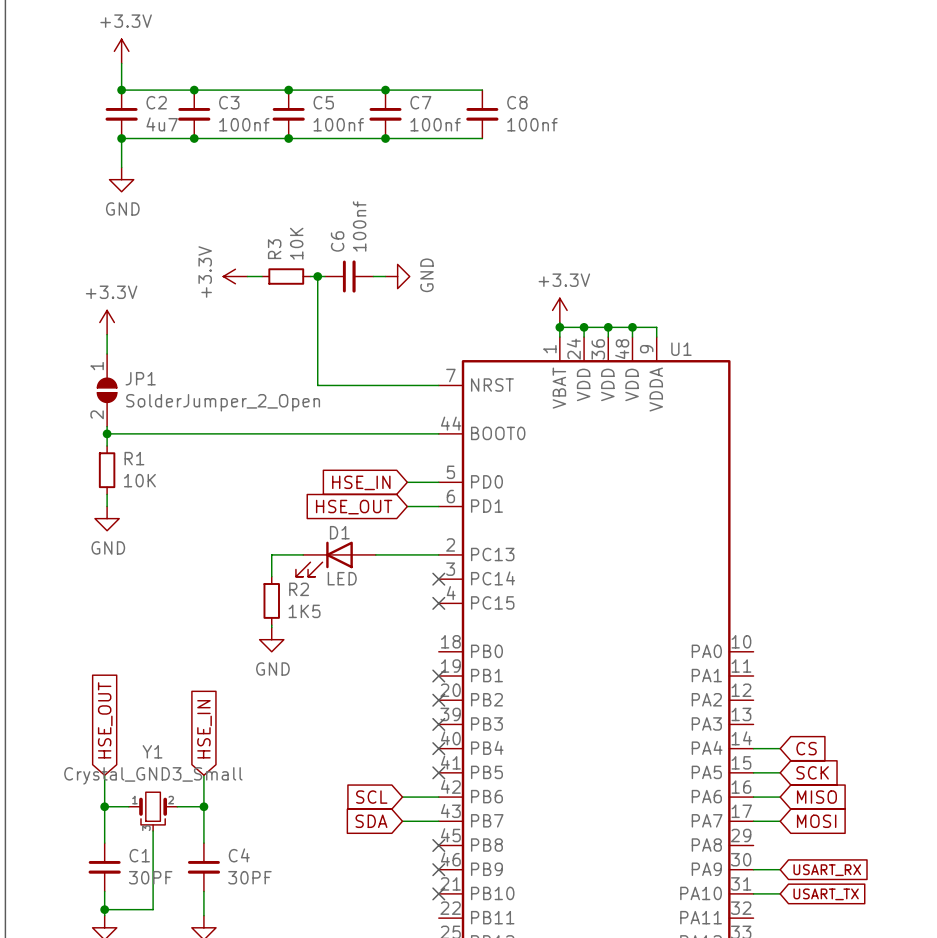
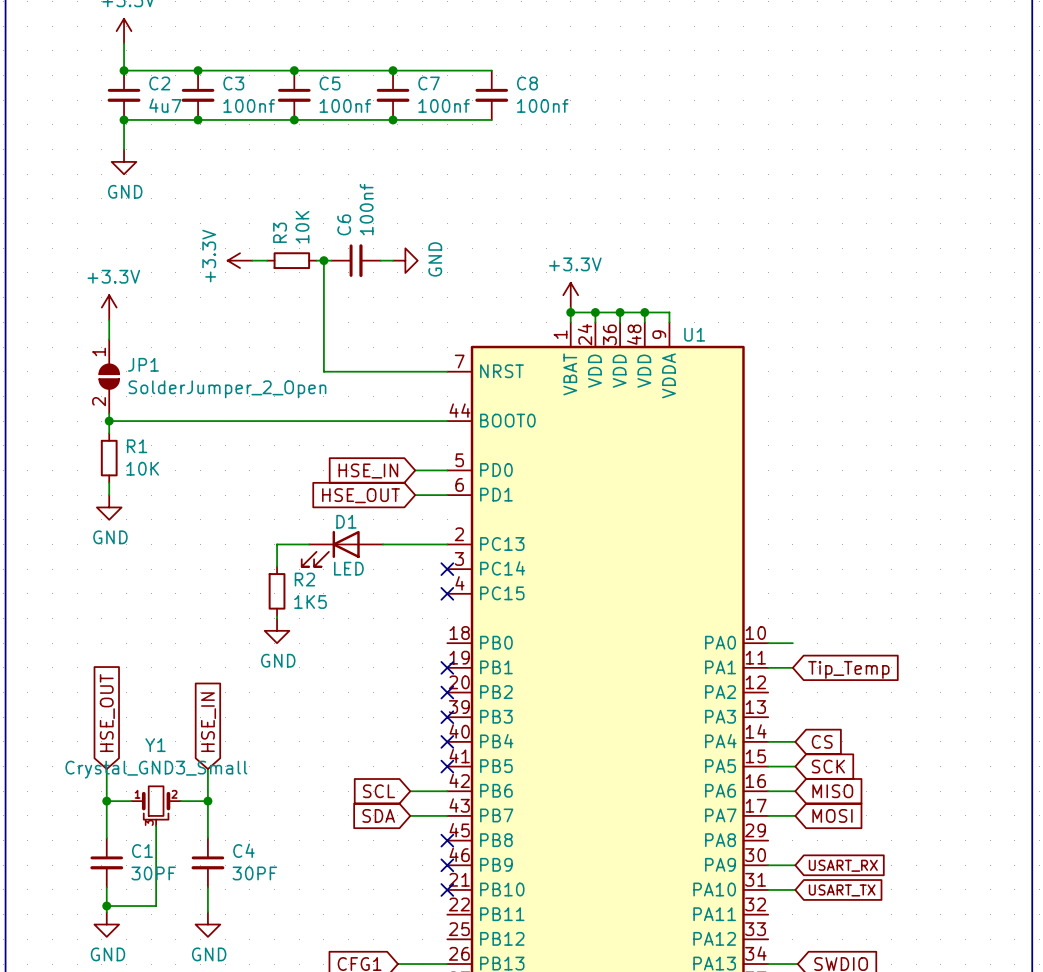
wire: none -> (768, 643) (792, 643)
wire: none -> (768, 667) (792, 667)
global label: none -> Tip_Temp (848, 669)

